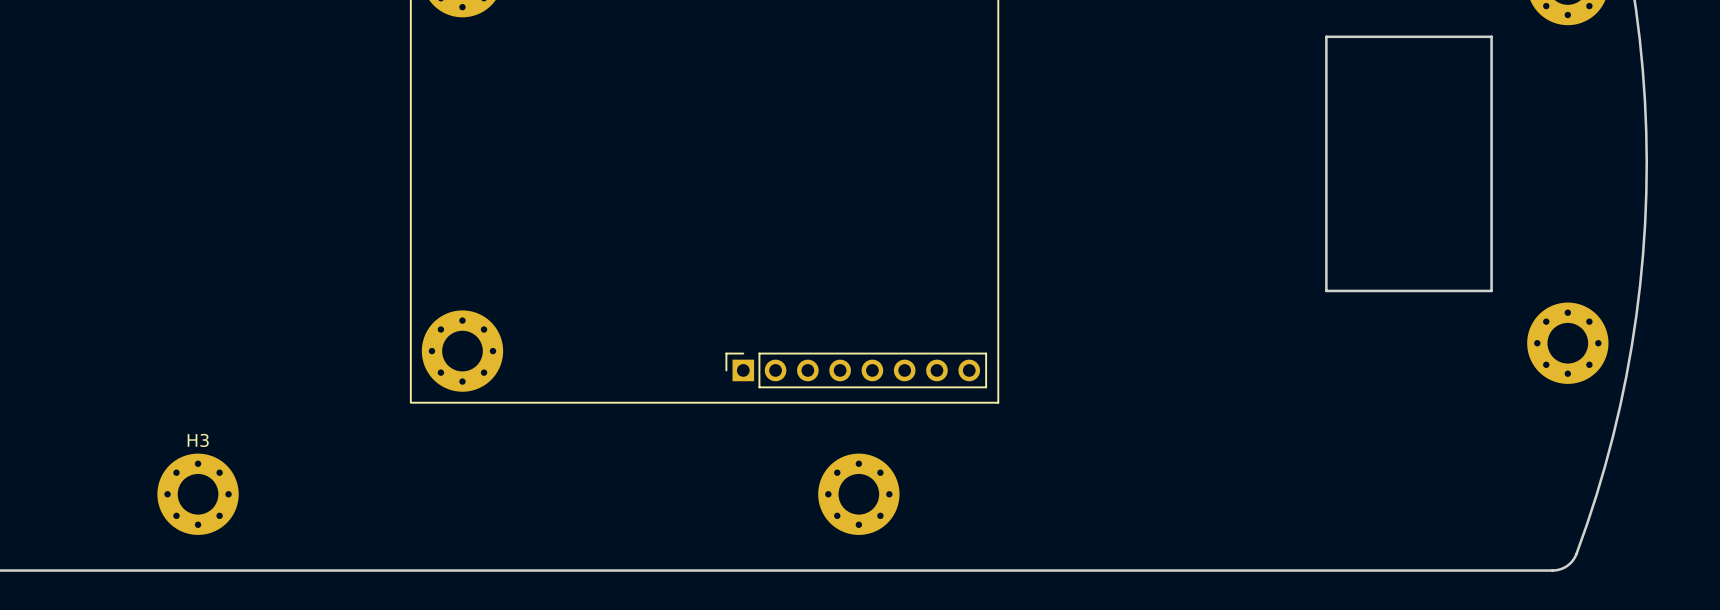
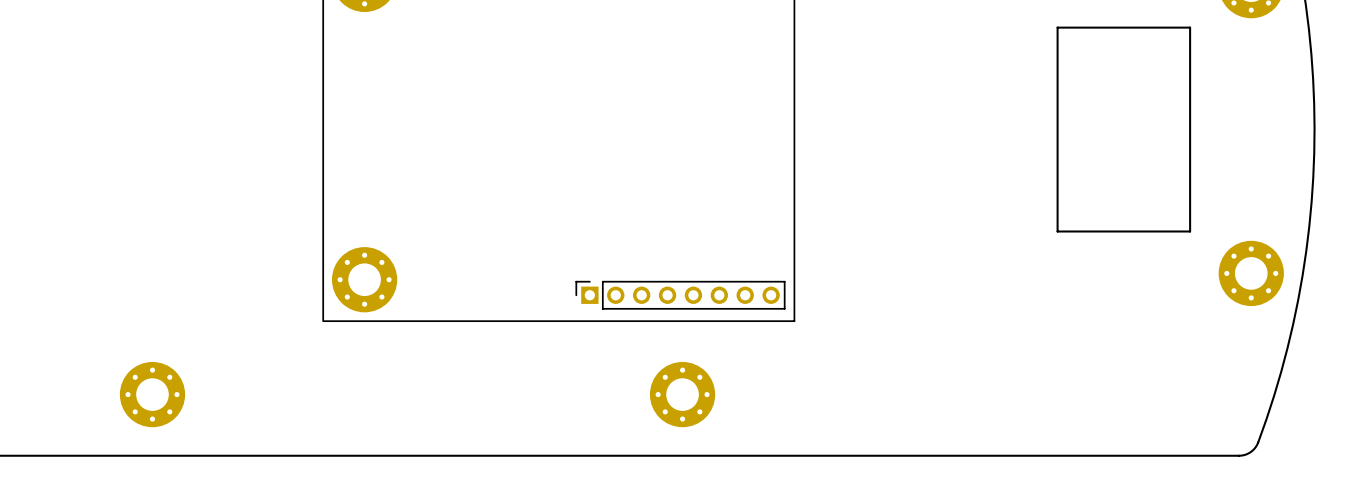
H3 name: H3 (198, 440) -> none

